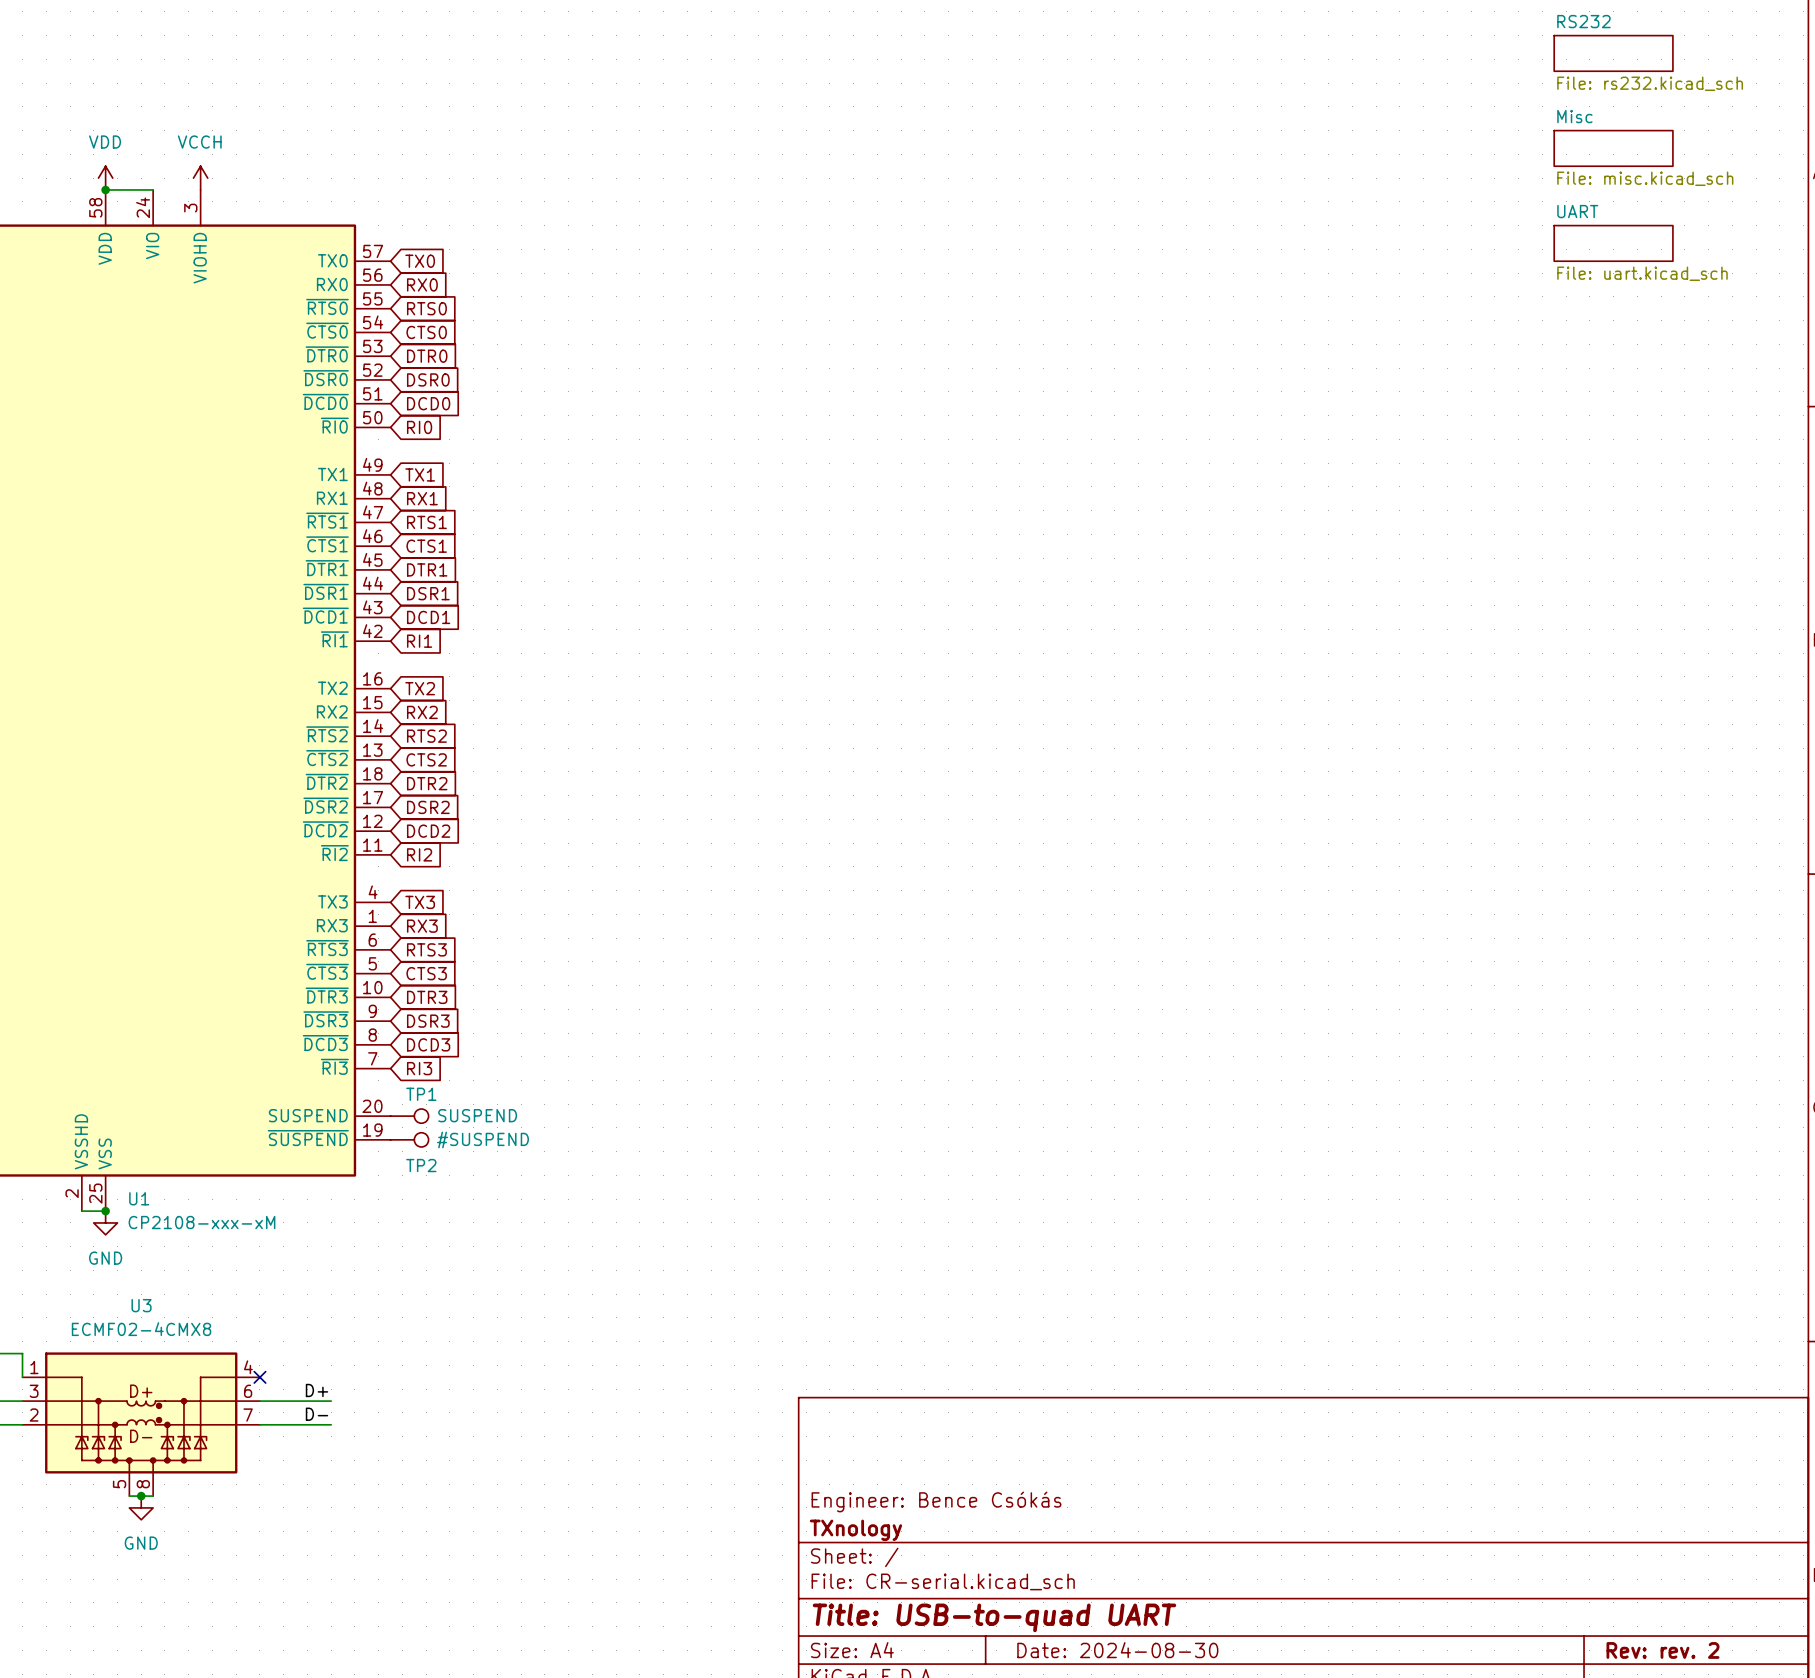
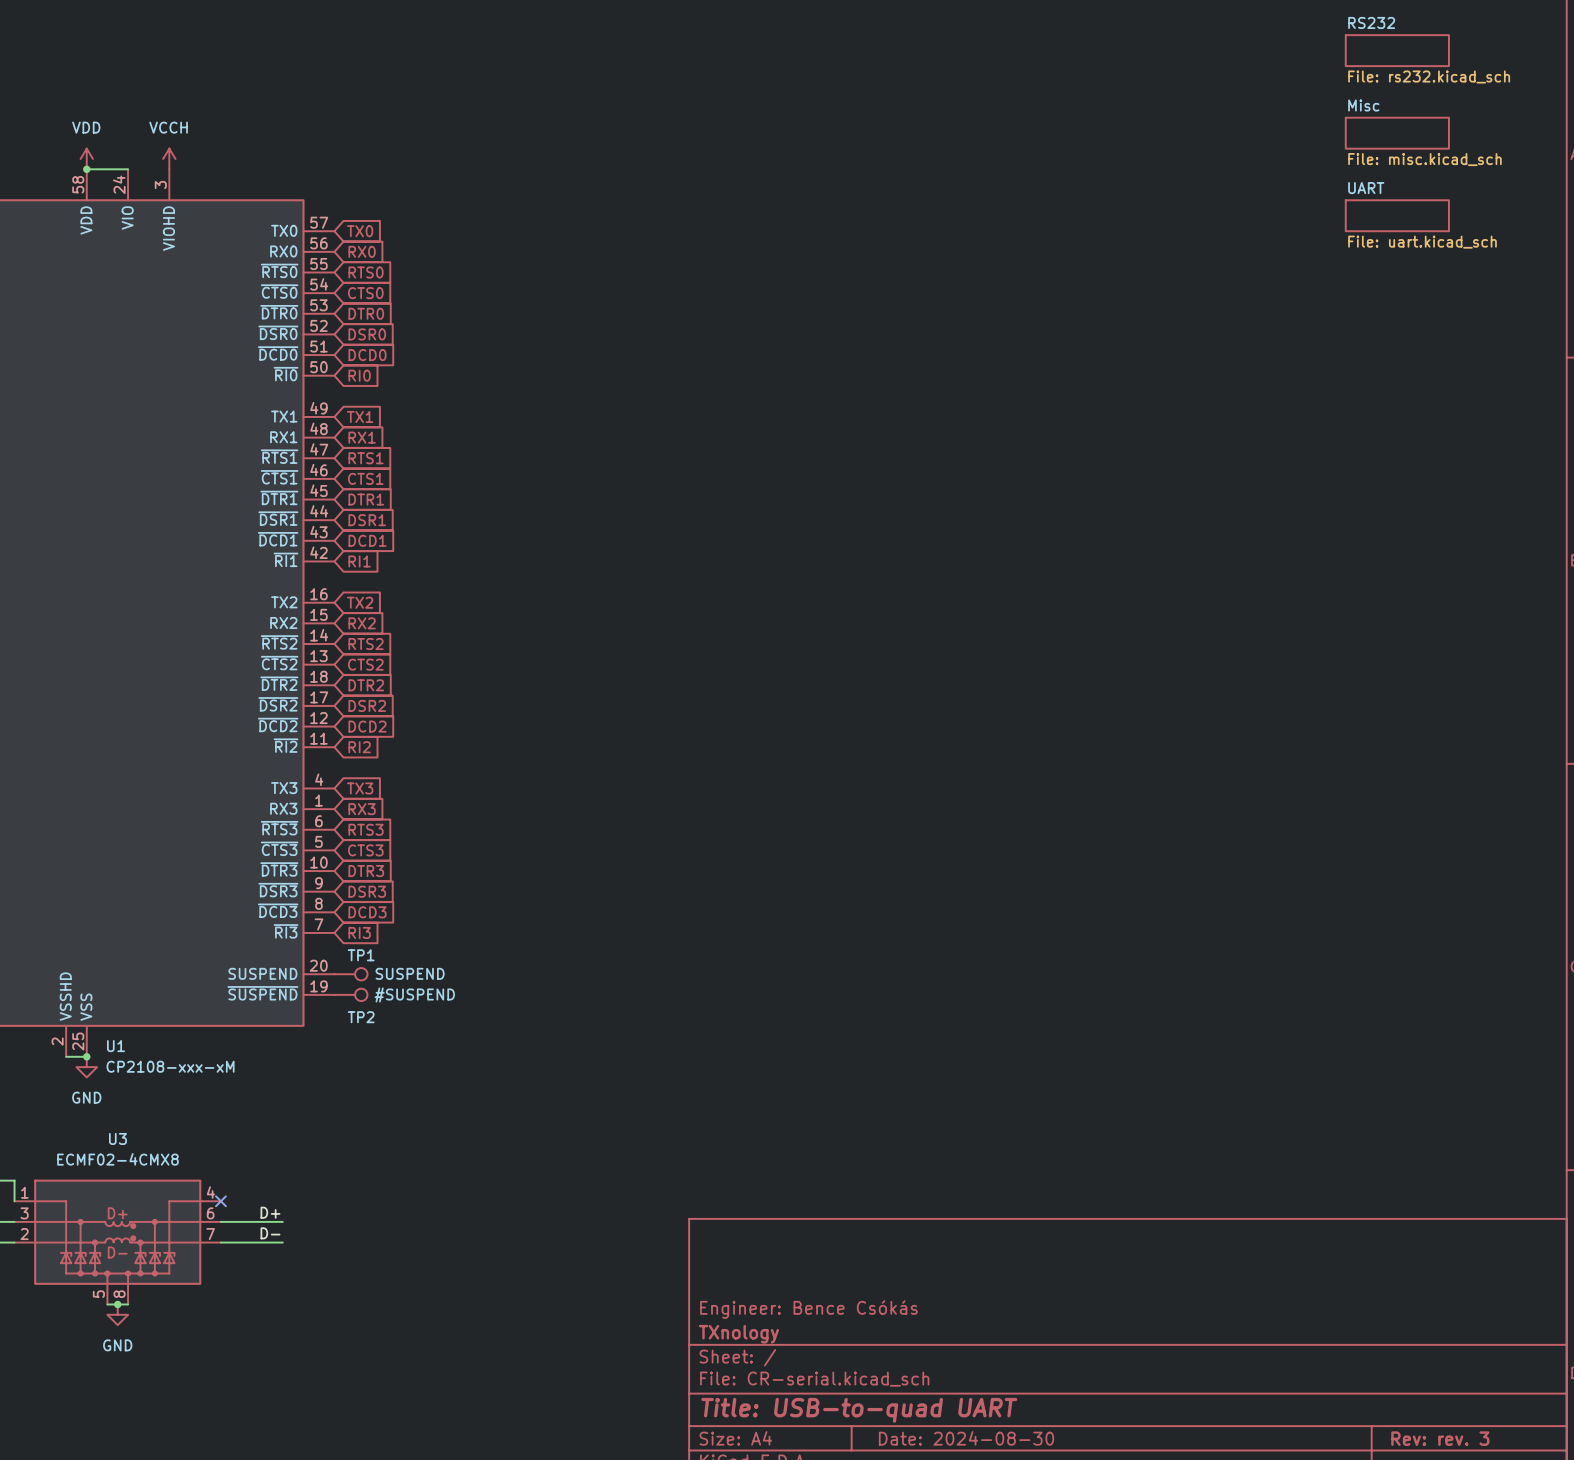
title block: Rev: rev. 2 (1662, 1650) -> Rev: rev. 3 (1440, 1438)

